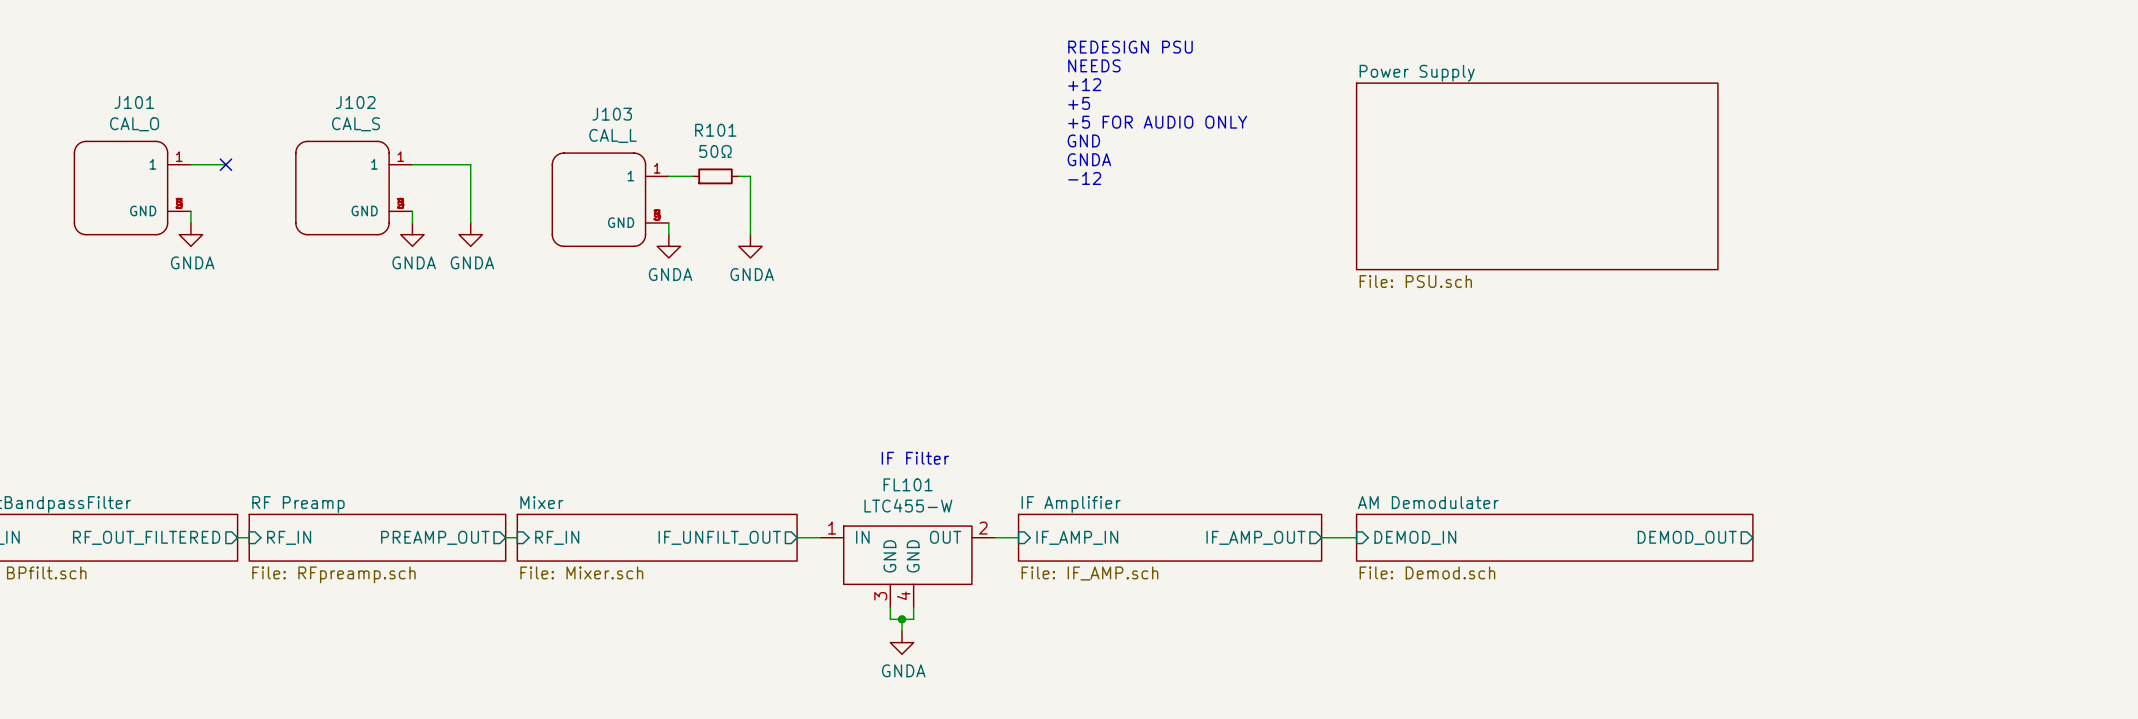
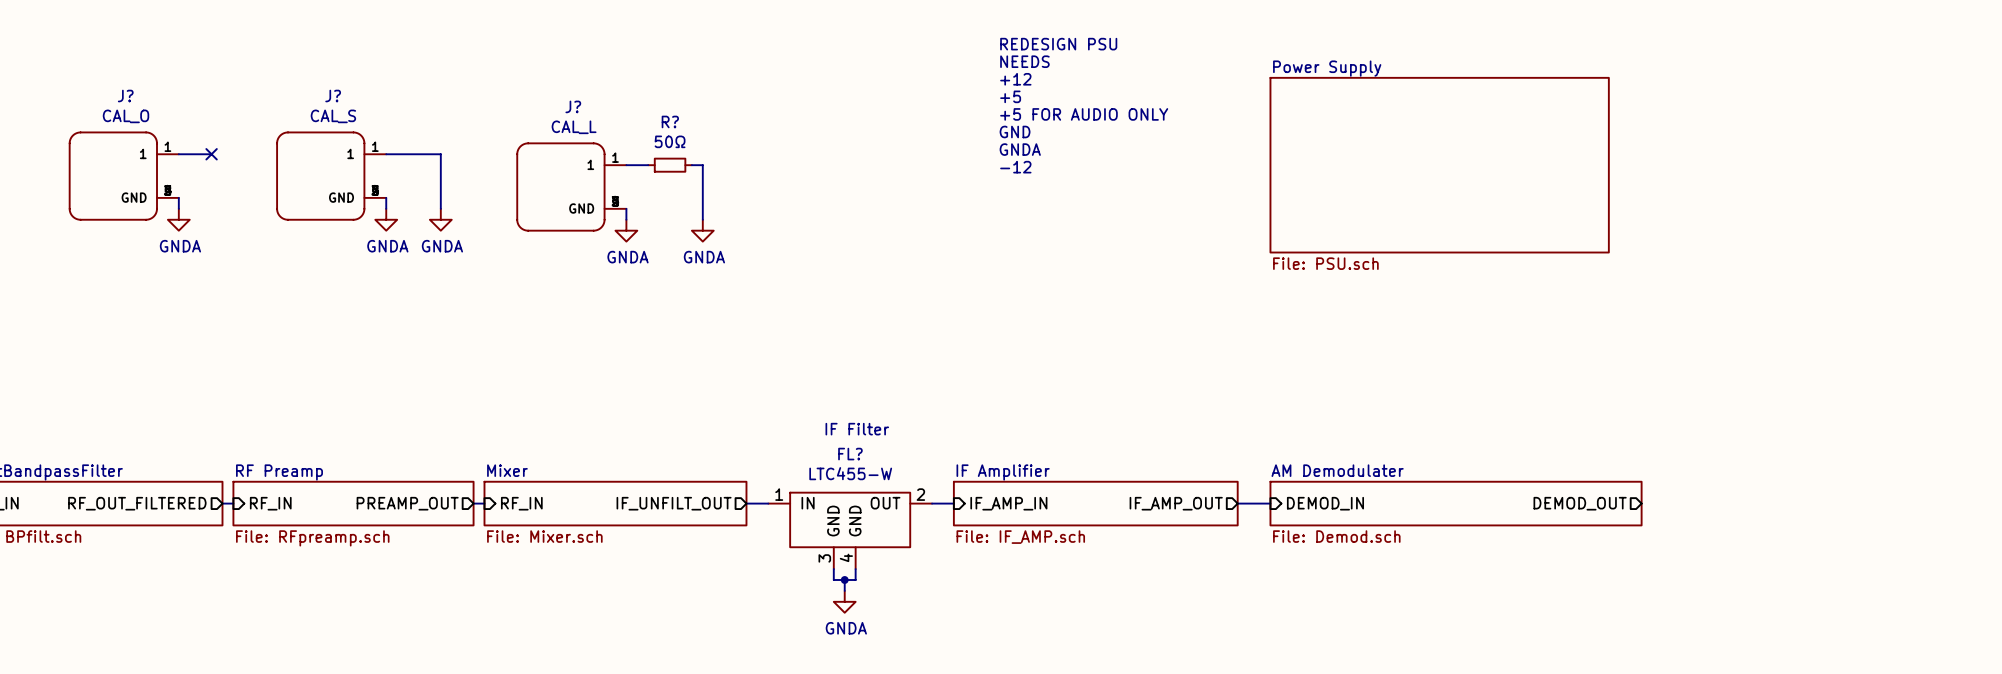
J101 name: J101 (134, 102) -> J? (125, 96)
J102 name: J102 (355, 102) -> J? (333, 96)
J103 name: J103 (612, 114) -> J? (573, 106)
R101 name: R101 (715, 130) -> R? (670, 121)
FL101 name: FL101 (908, 484) -> FL? (850, 454)

